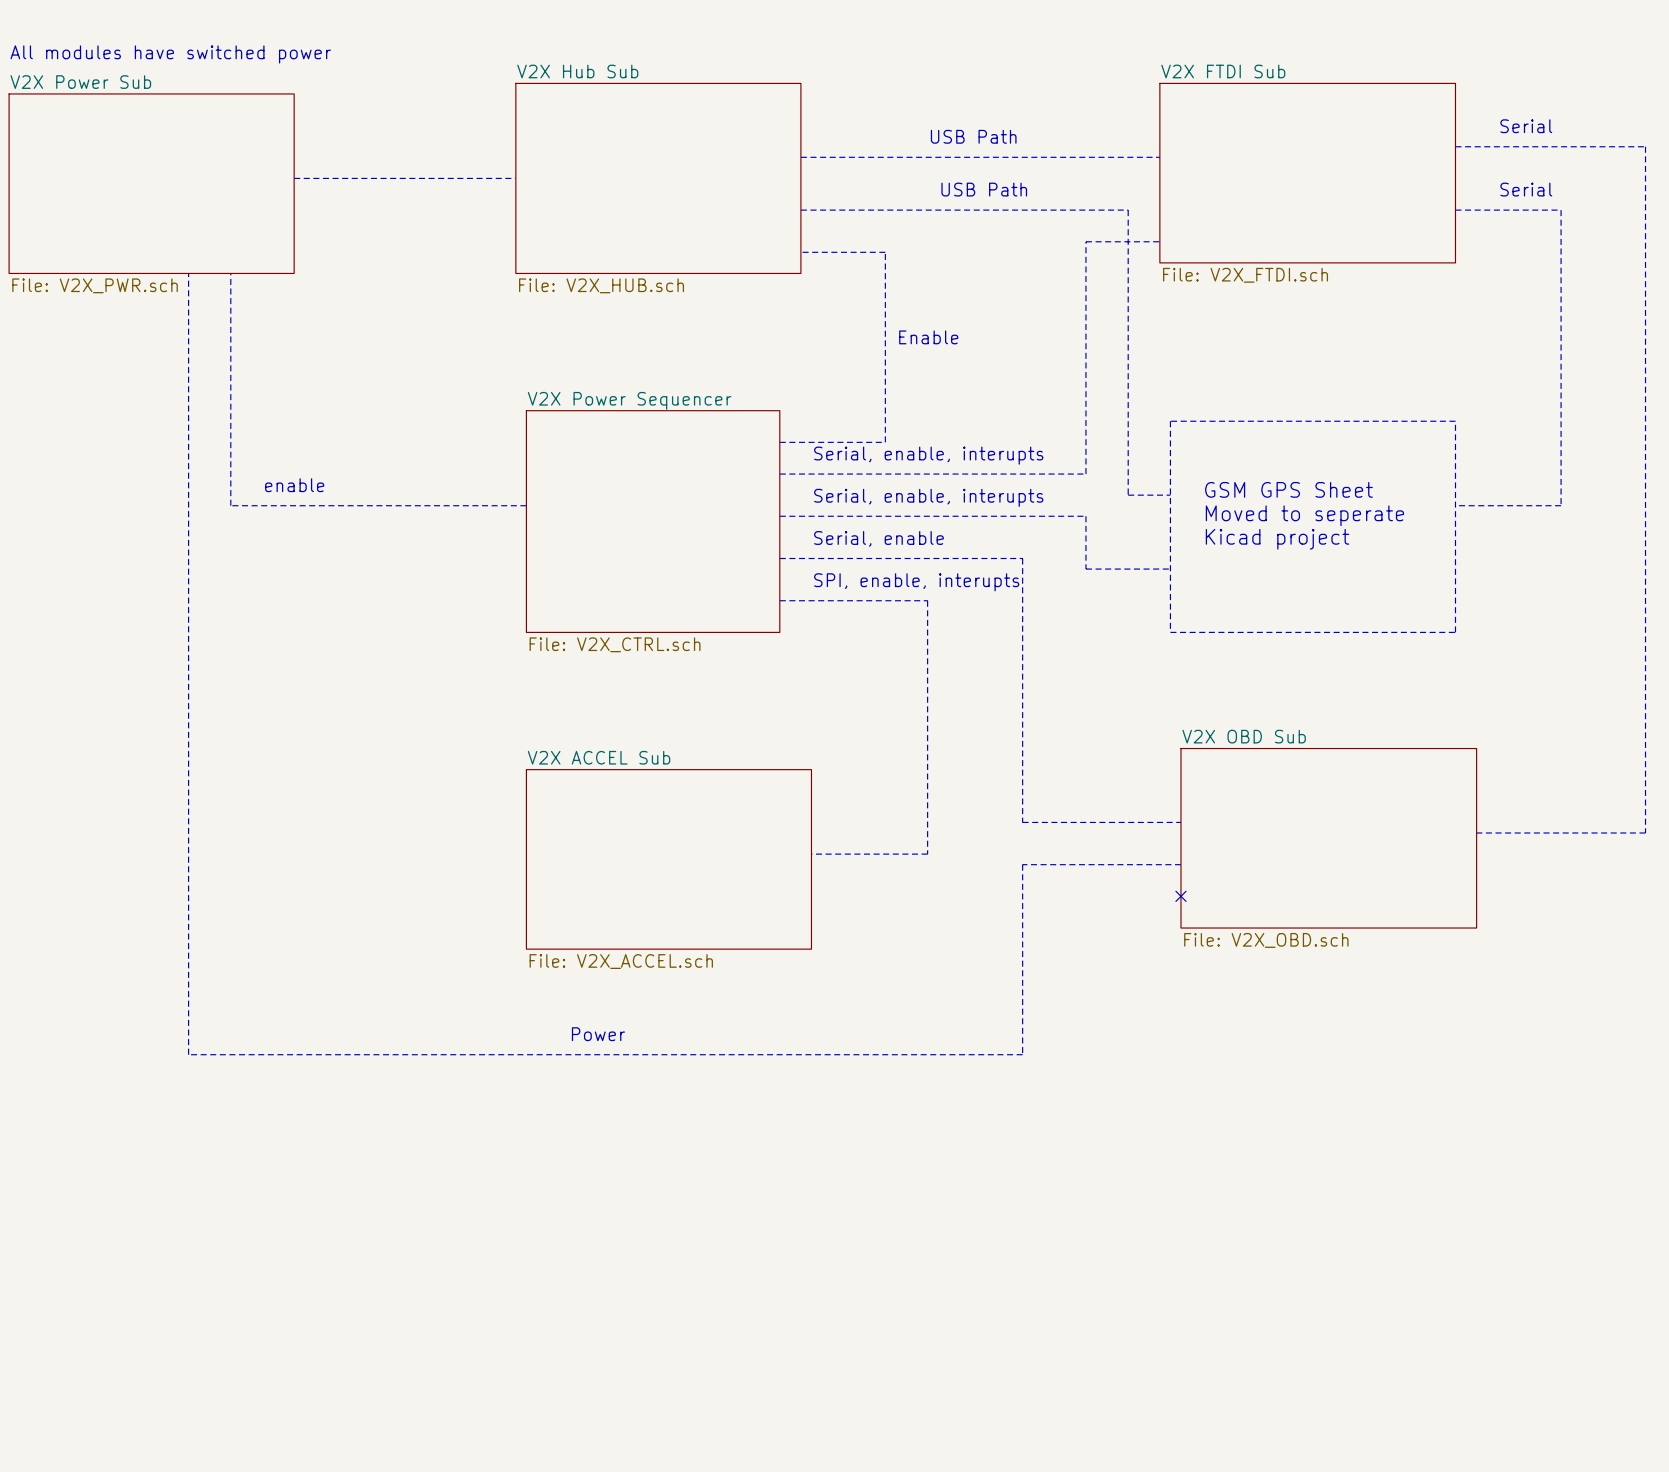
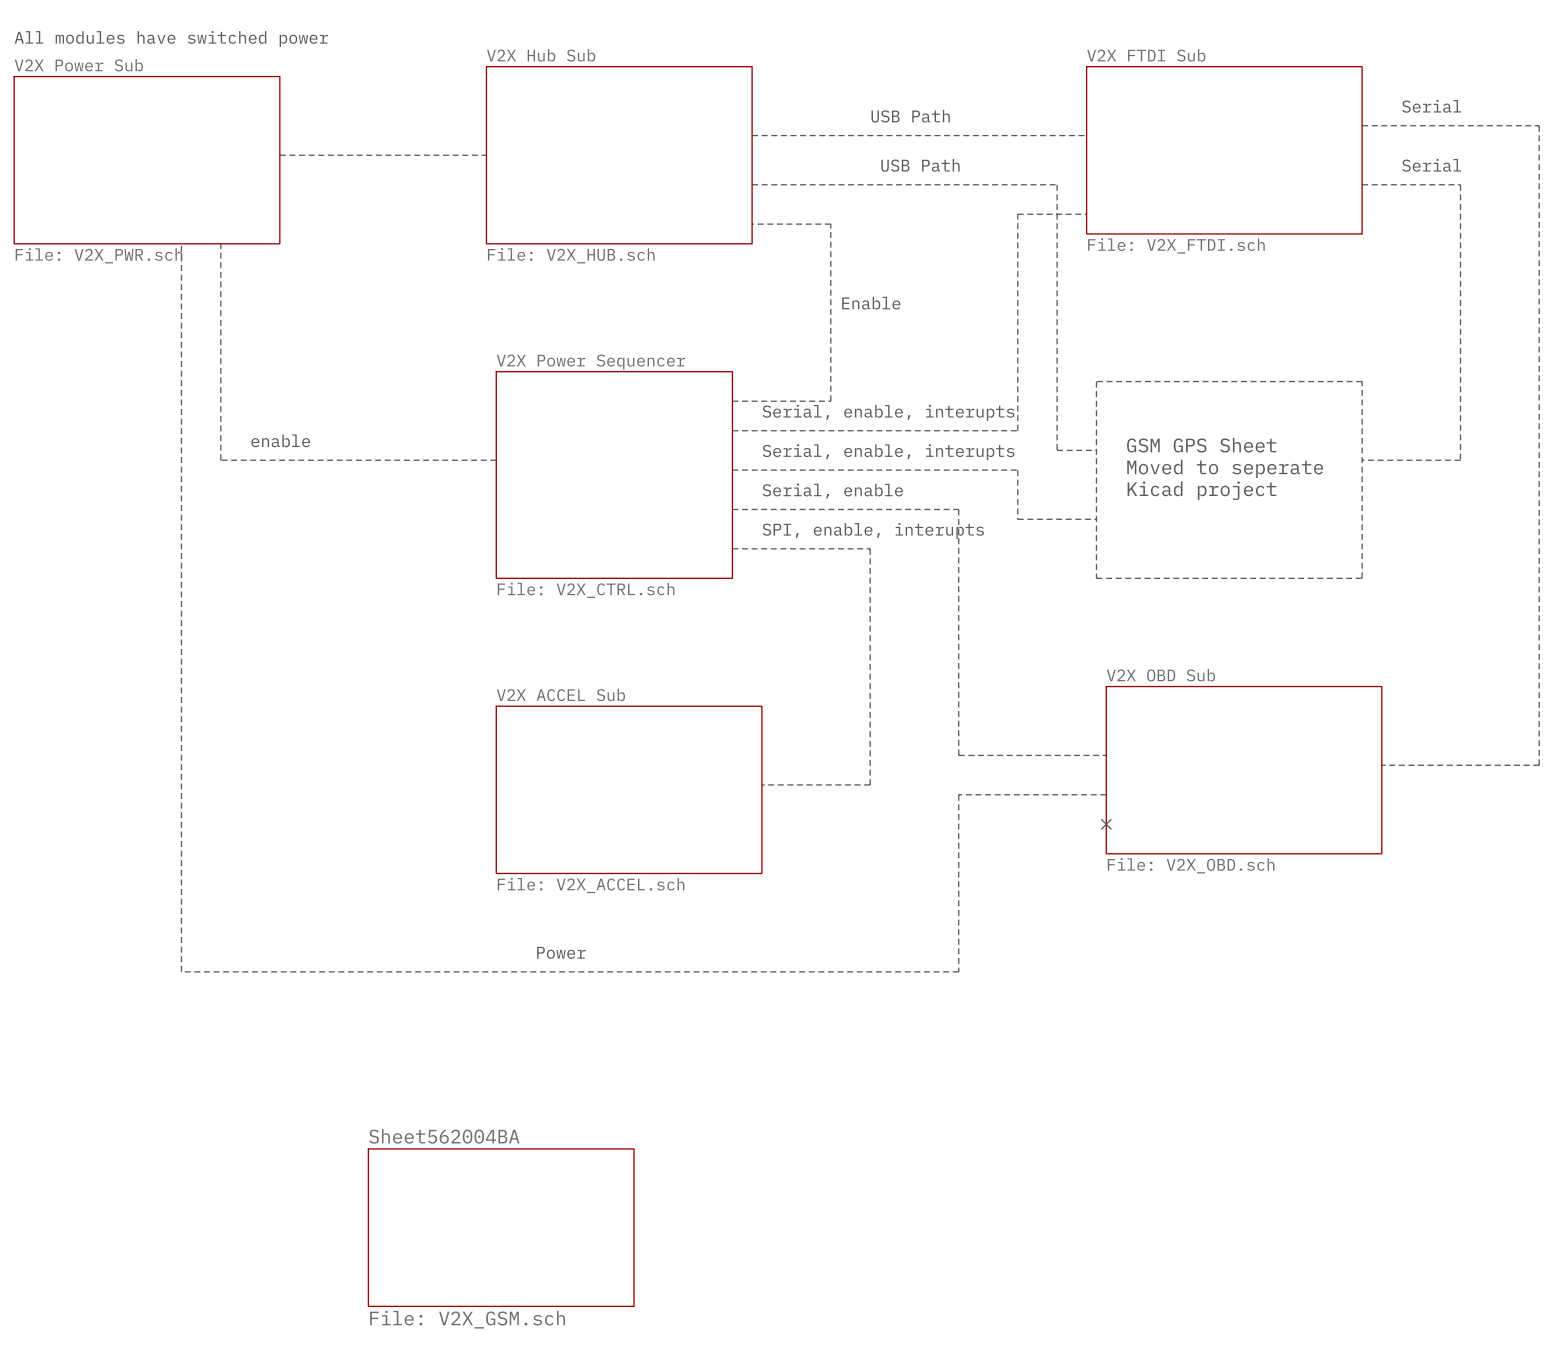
sheet Sheet562004BA: none -> File: V2X_GSM.sch (501, 1227)

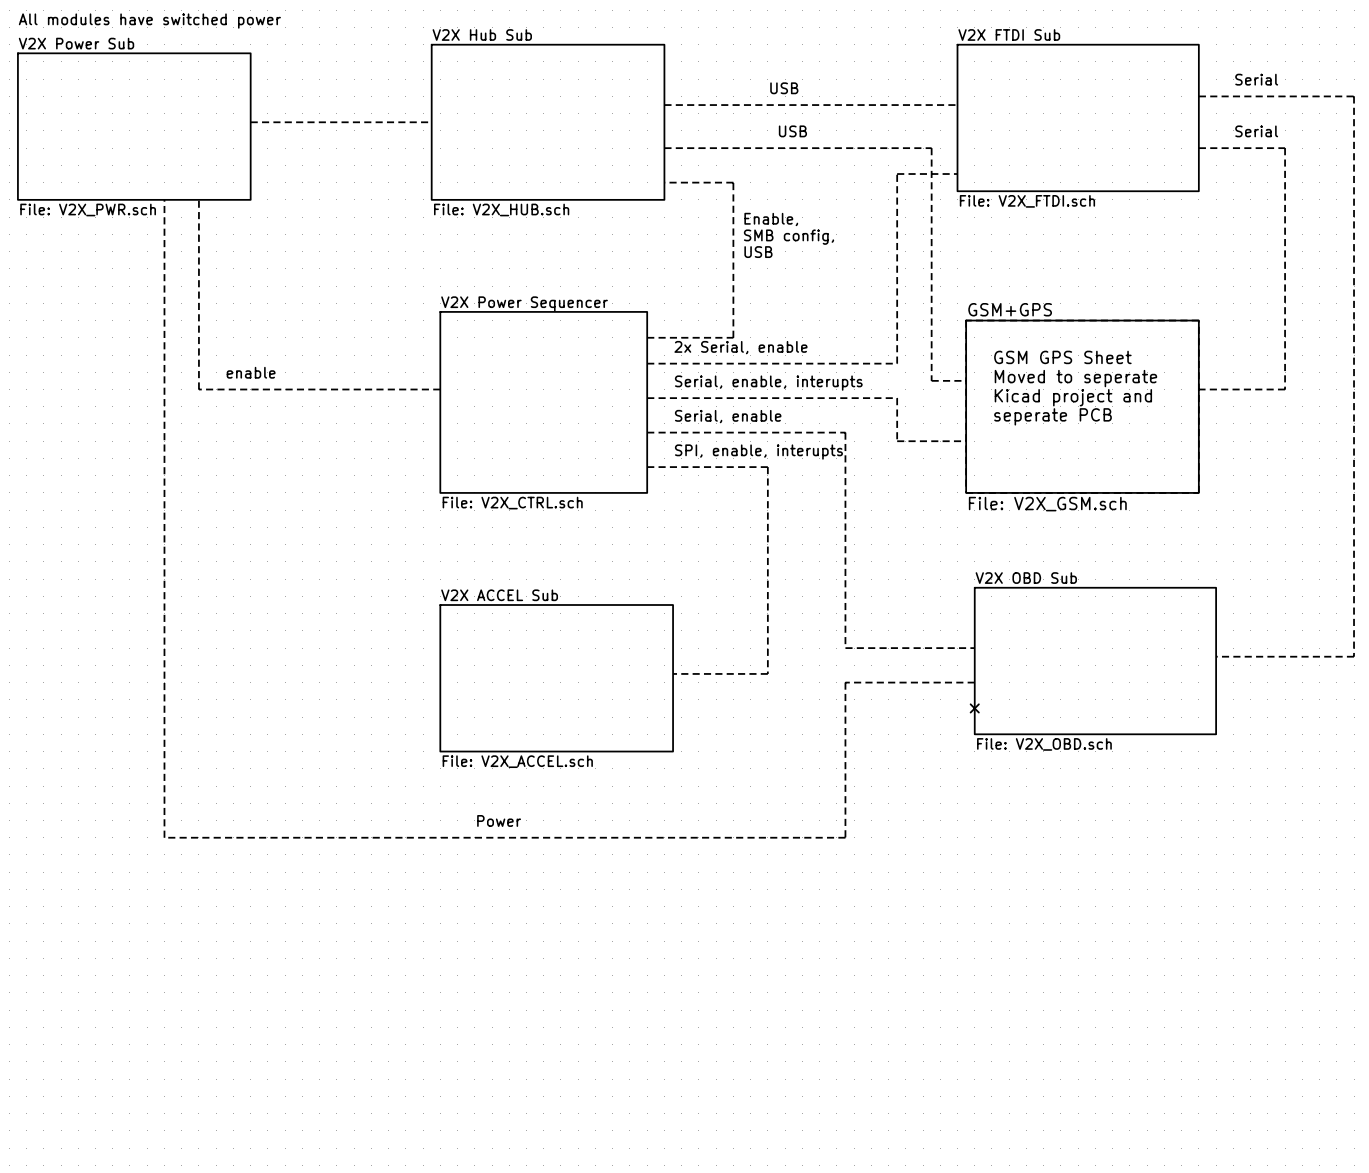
text: USB Path (910, 116) -> USB (784, 88)
text: USB Path (920, 165) -> USB (792, 131)
text: none -> Enable, (771, 219)
text: none -> SMB config, (788, 237)
text: Enable (871, 303) -> USB (758, 252)
text: Serial, enable, interupts (888, 412) -> 2x Serial, enable (740, 347)
text: none -> GSM GPS Sheet (1062, 357)
text: GSM GPS Sheet (1201, 445) -> Moved to seperate (1075, 378)
text: Moved to seperate (1225, 468) -> Kicad project and (1073, 397)
sheet GSM+GPS: none -> File: V2X_GSM.sch (1082, 406)
text: Kicad project (1201, 490) -> seperate PCB (1052, 416)
sheet Sheet562004BA: File: V2X_GSM.sch (501, 1227) -> none

